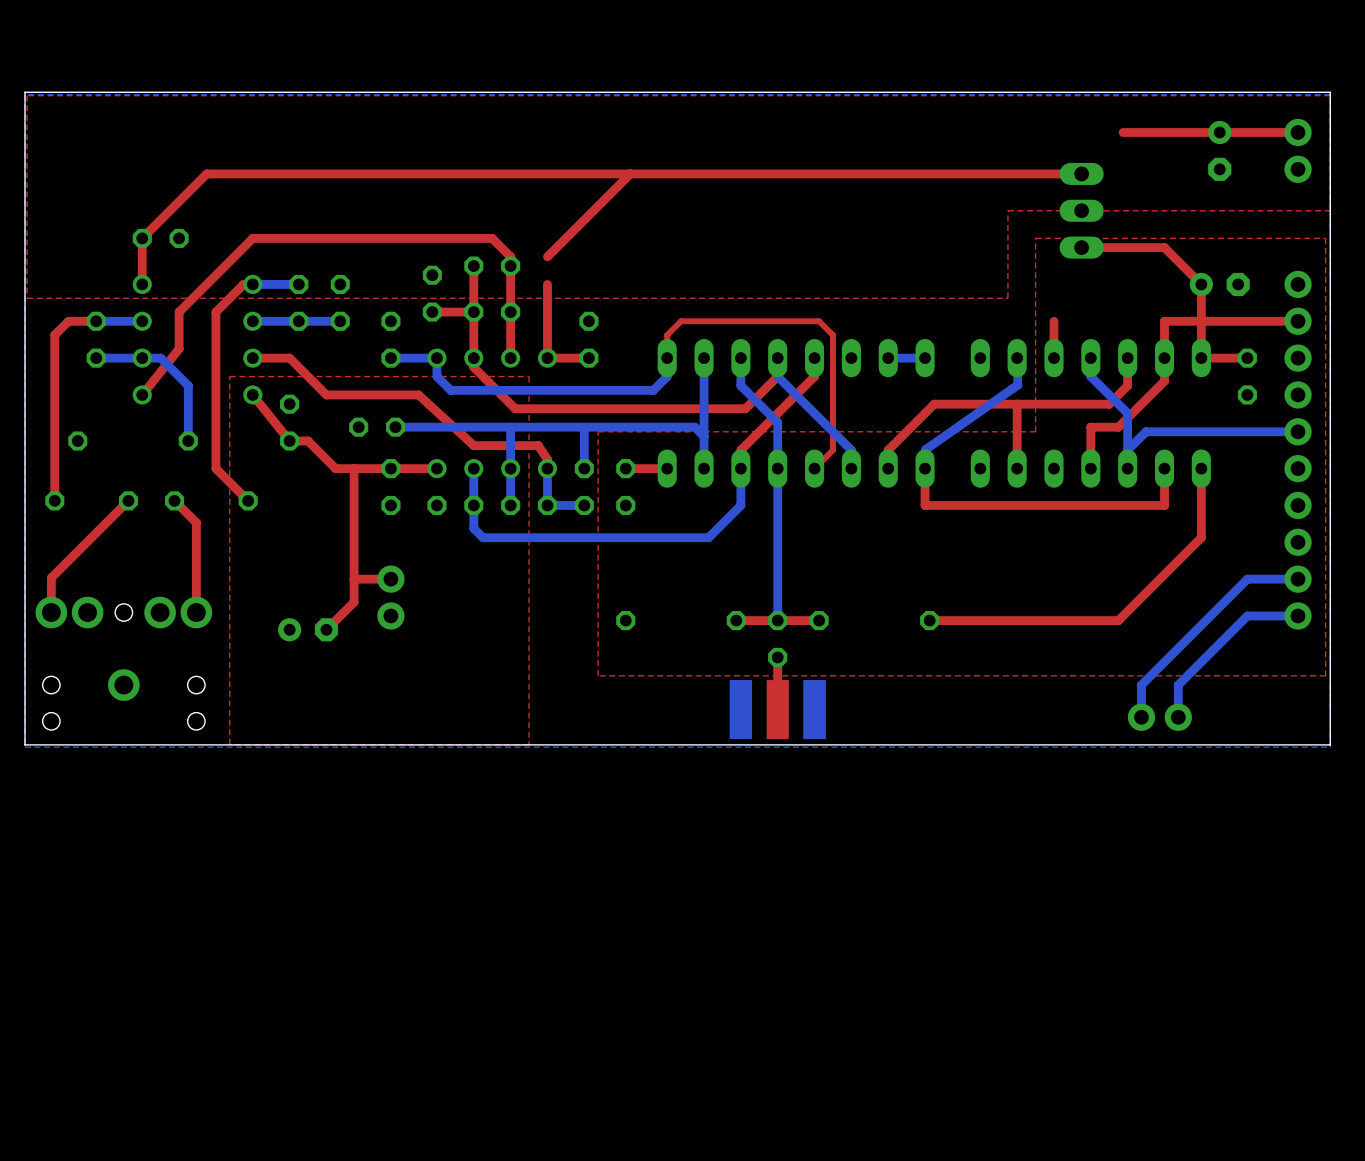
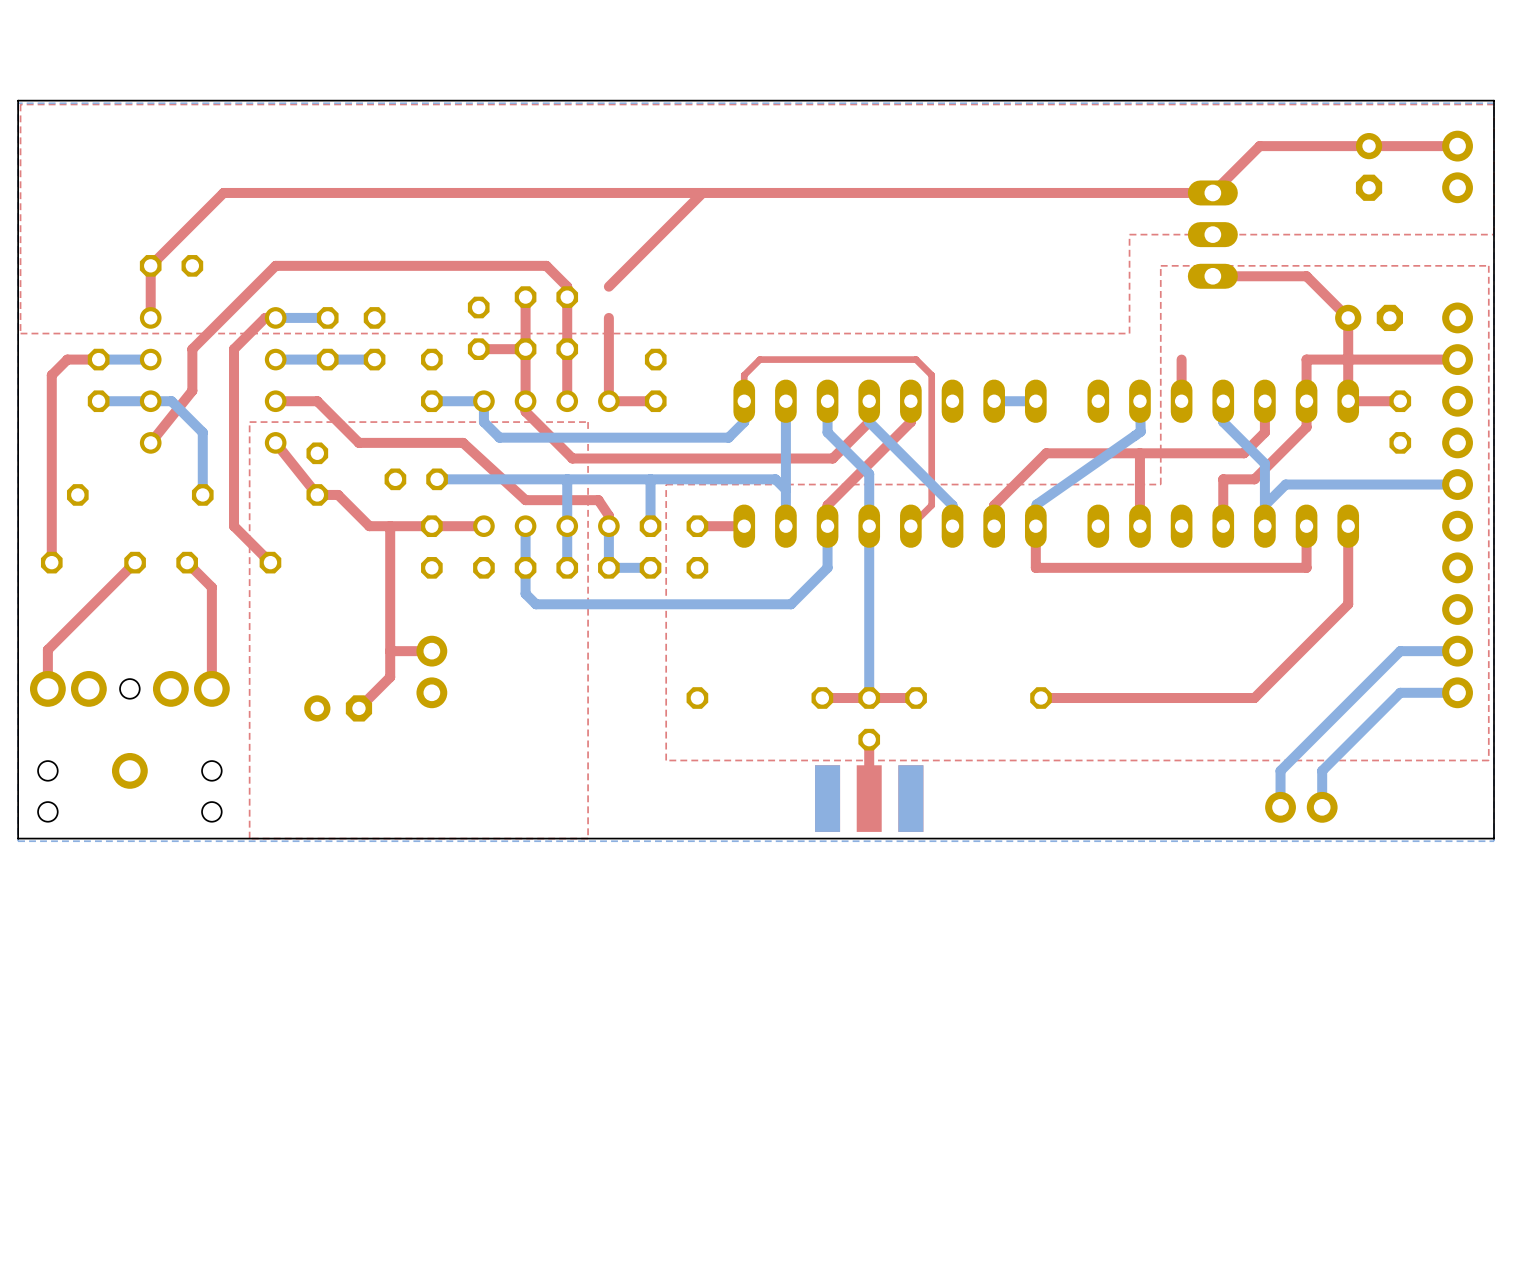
top track: none -> (1259, 146) (1212, 192)

